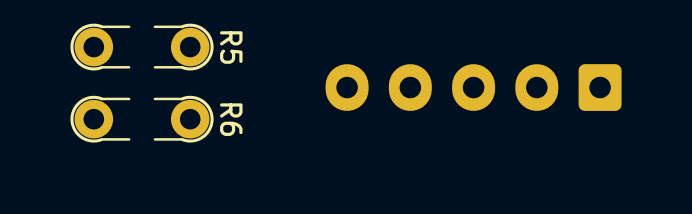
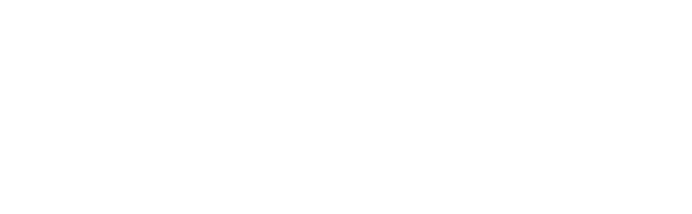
R5: (142, 47) -> none
part: (473, 87) -> none
R6: (142, 119) -> none

